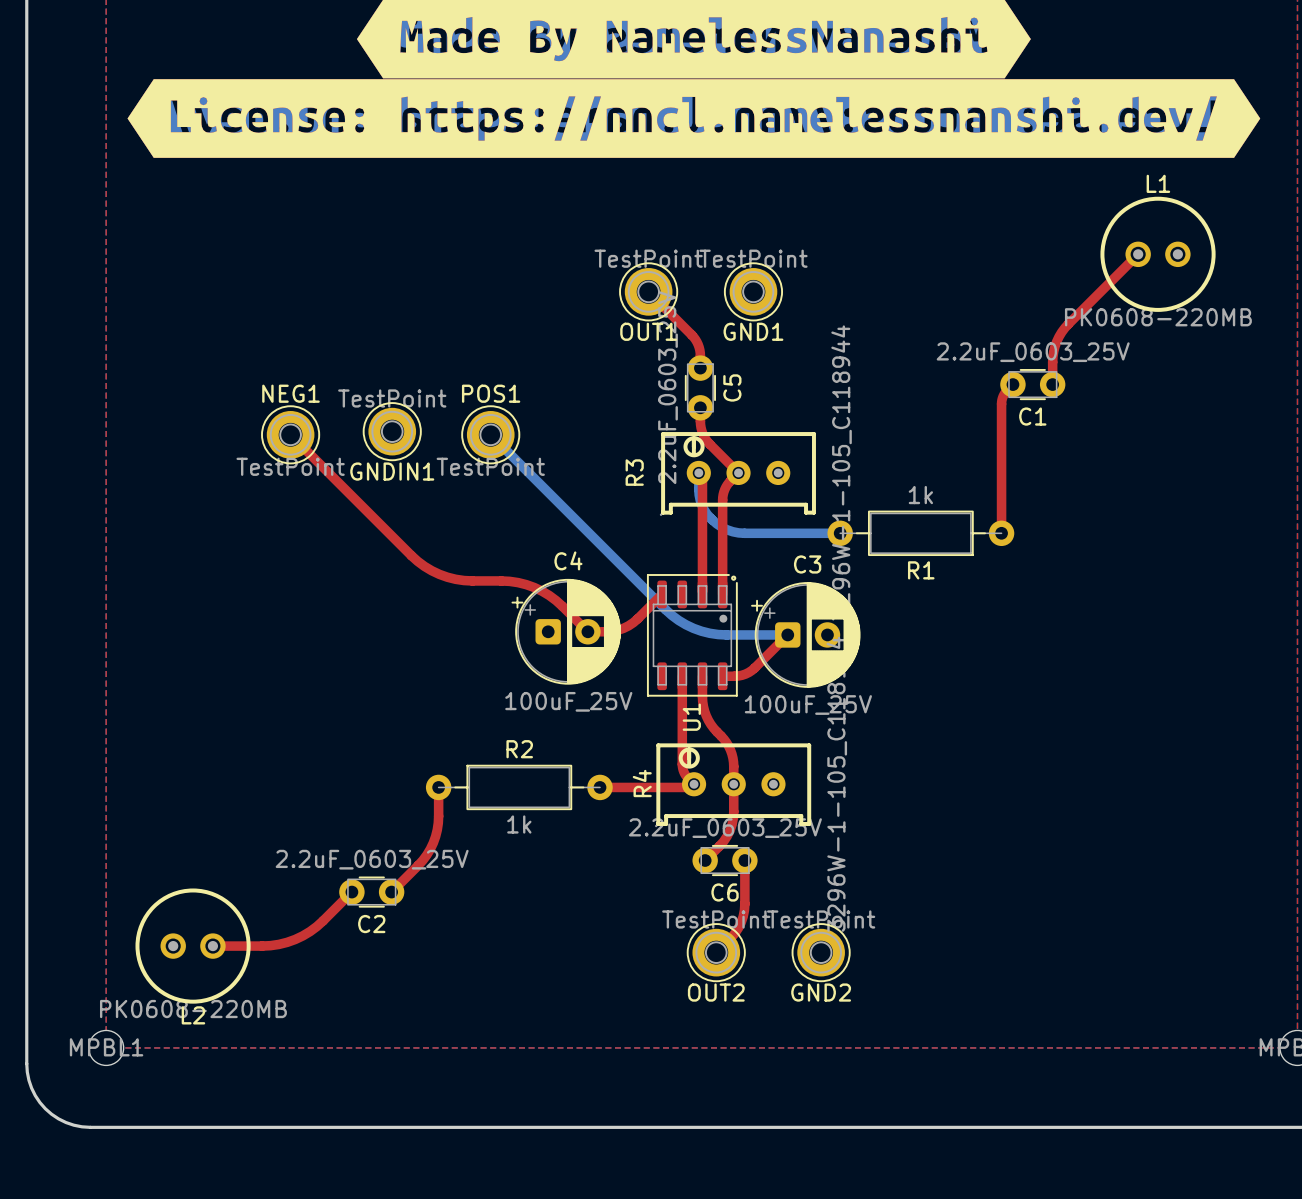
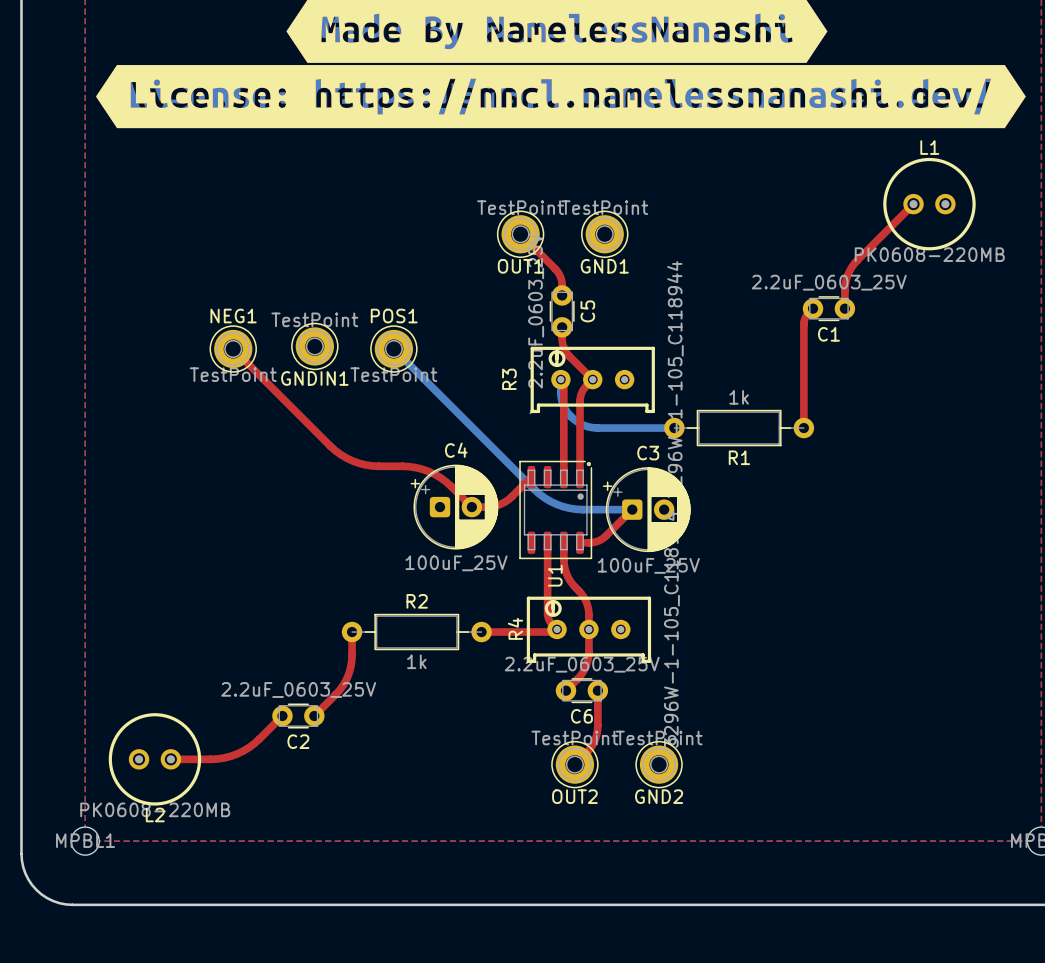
drawing: [127, 79, 1261, 158] -> none
drawing: none -> [96, 65, 1026, 129]

